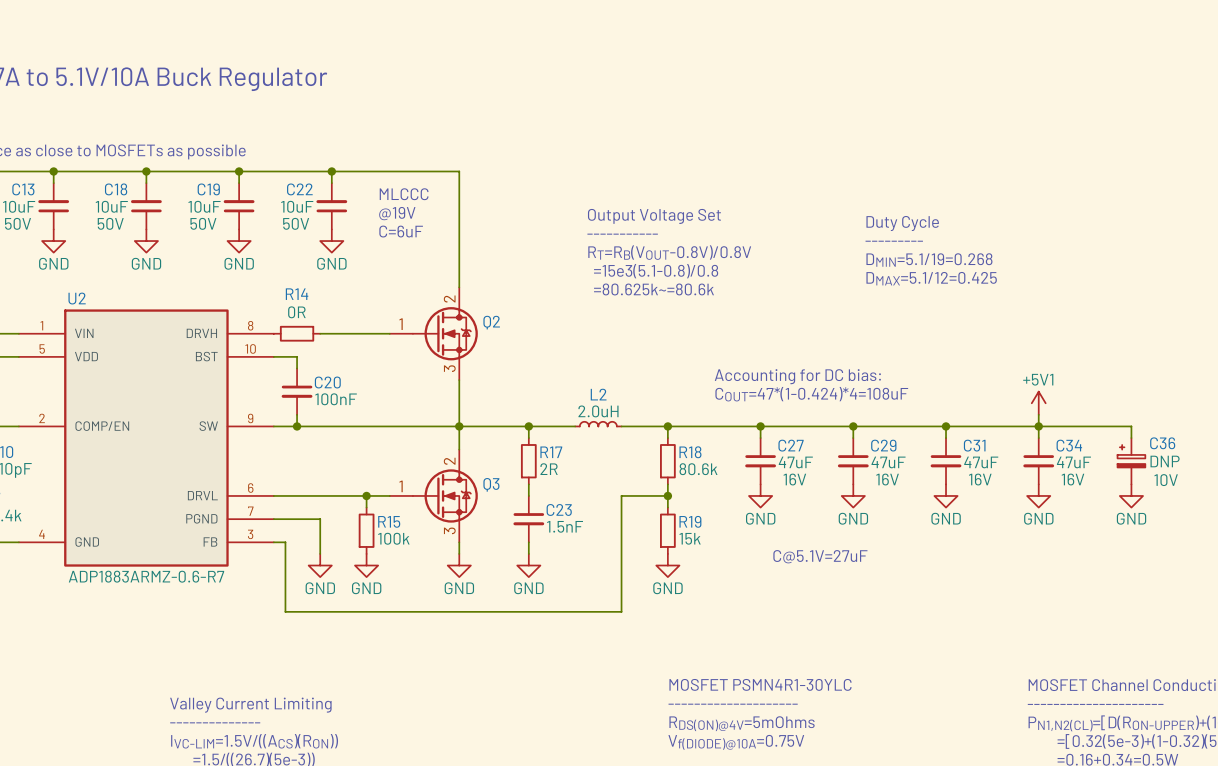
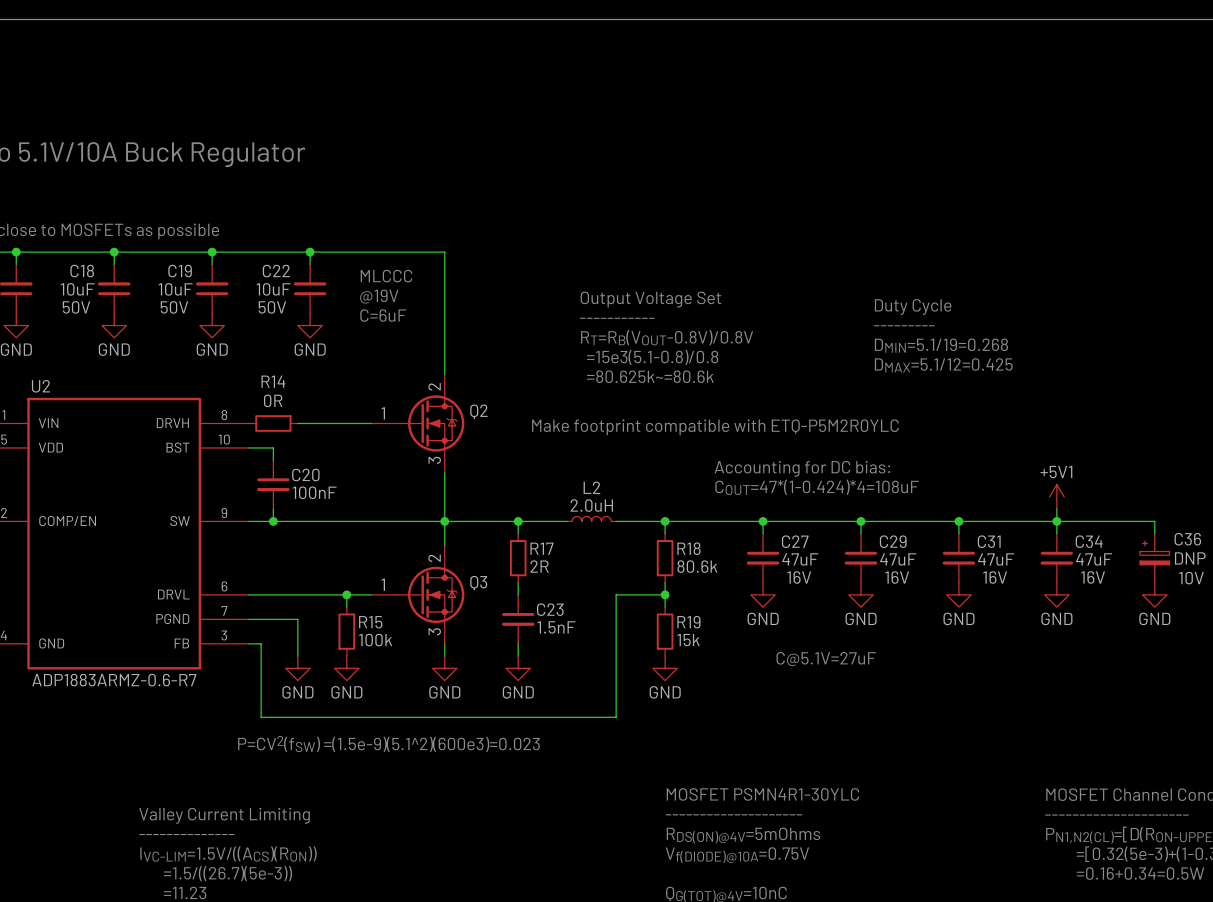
text: none -> Make footprint compatible with ETQ-P5M2R0YLC (715, 427)
text: none -> P=CV2(fSW) =(1.5e-9)(5.1^2)(600e3)=0.023 (388, 744)

